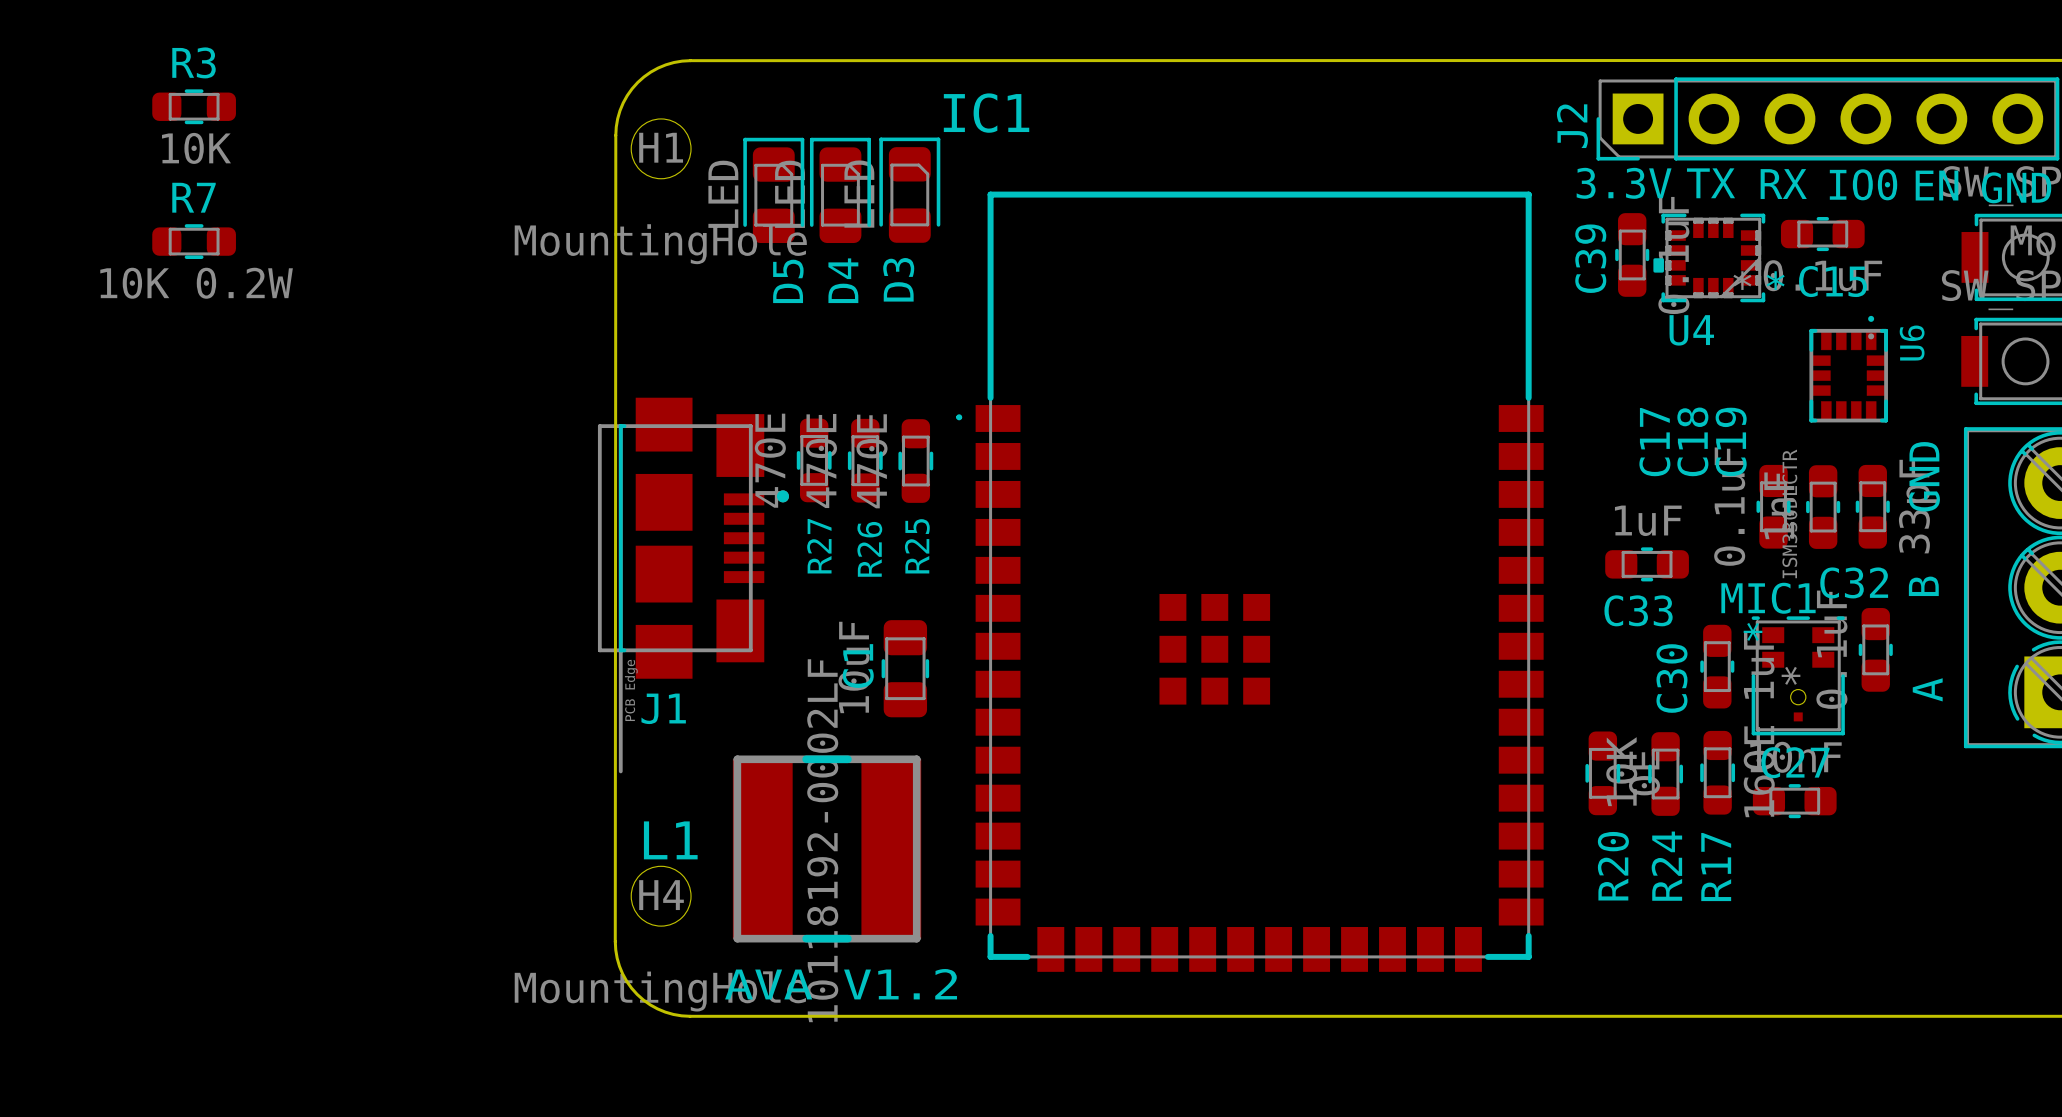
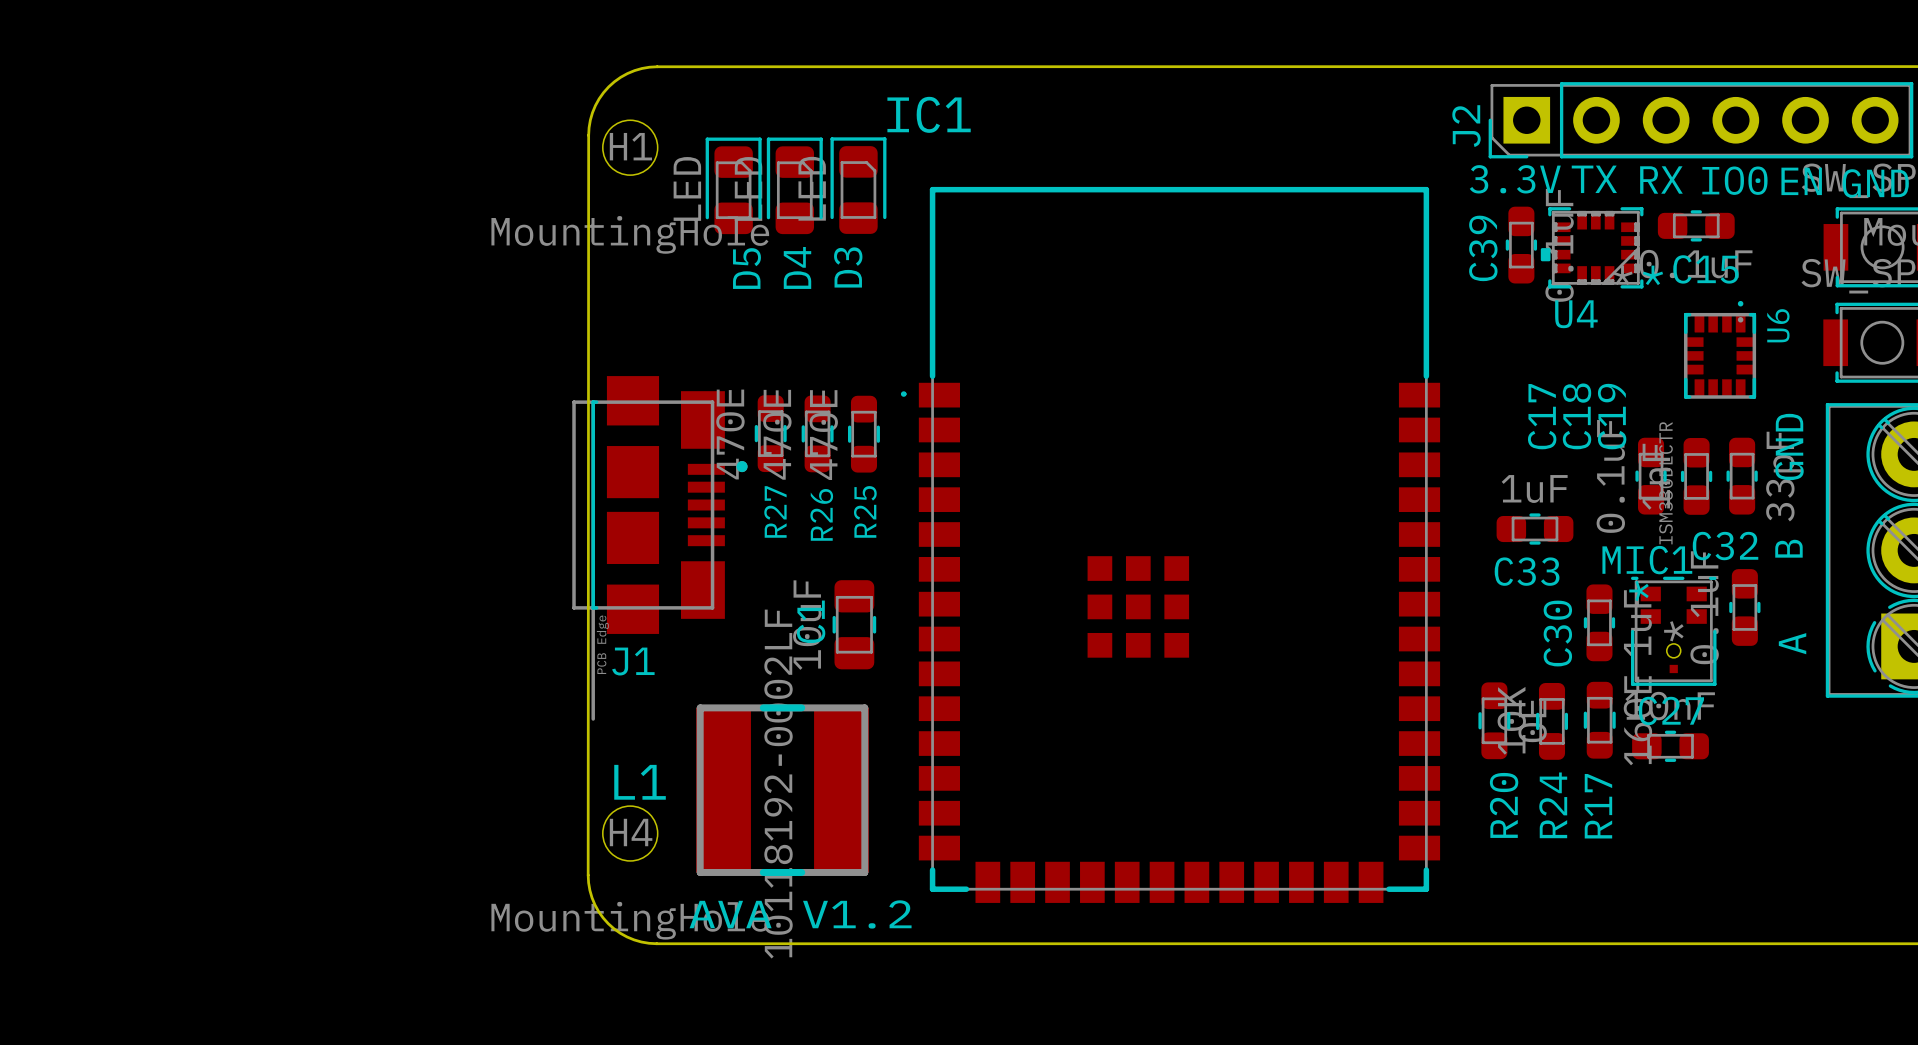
R3: 10K (194, 106) -> none
R7: 10K 0.2W (194, 241) -> none

